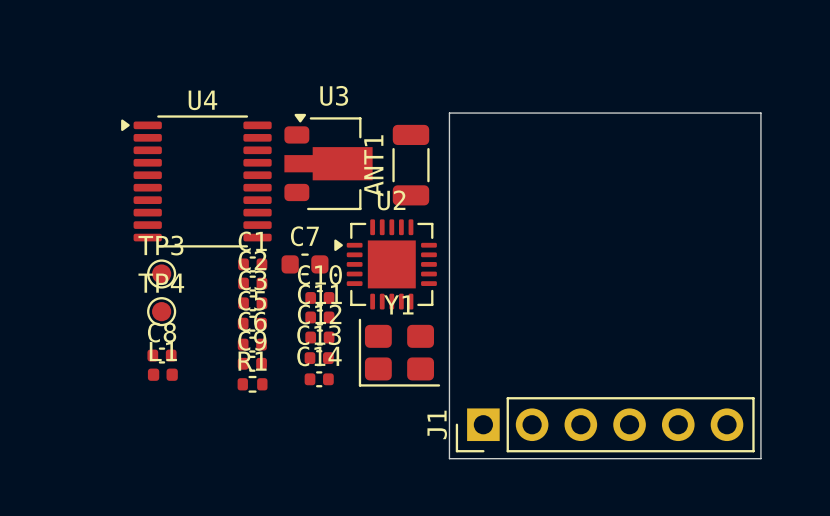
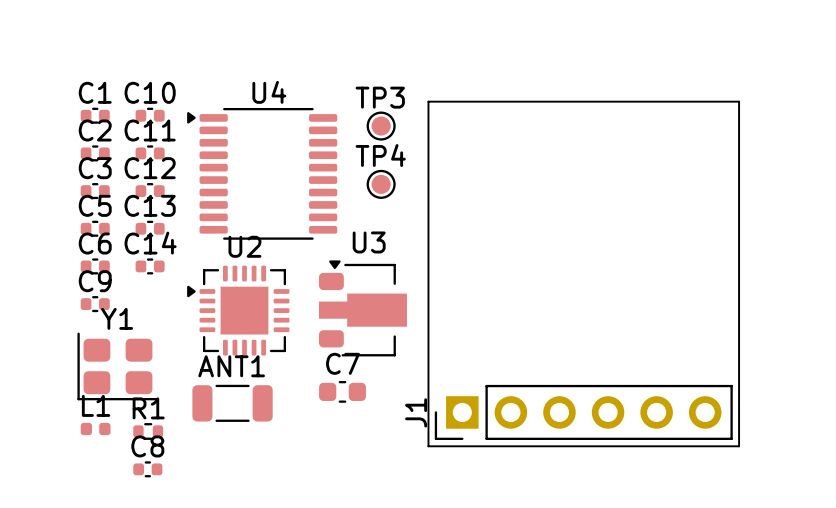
U3 position: (328, 161) -> (362, 308)
ANT1 rotation: 0° (410, 165) -> 90° clockwise (232, 403)
ANT1 position: (410, 165) -> (232, 403)
U4 position: (196, 181) -> (262, 173)
C1 position: (252, 264) -> (95, 115)
C7 position: (305, 264) -> (342, 391)
U2 position: (385, 264) -> (238, 310)
TP3 position: (161, 274) -> (381, 126)
C2 position: (252, 283) -> (95, 153)
C10 position: (319, 297) -> (150, 115)
C3 position: (252, 303) -> (95, 191)
TP4 position: (161, 311) -> (381, 184)
C11 position: (319, 317) -> (150, 153)
C5 position: (252, 323) -> (95, 228)
C12 position: (319, 337) -> (150, 191)
C6 position: (252, 344) -> (95, 266)
Y1 position: (399, 352) -> (117, 366)
C8 position: (162, 355) -> (147, 469)
C13 position: (319, 358) -> (150, 228)
C9 position: (252, 363) -> (95, 304)
L1 position: (162, 374) -> (95, 428)
C14 position: (319, 379) -> (150, 266)
R1 position: (252, 384) -> (148, 431)

